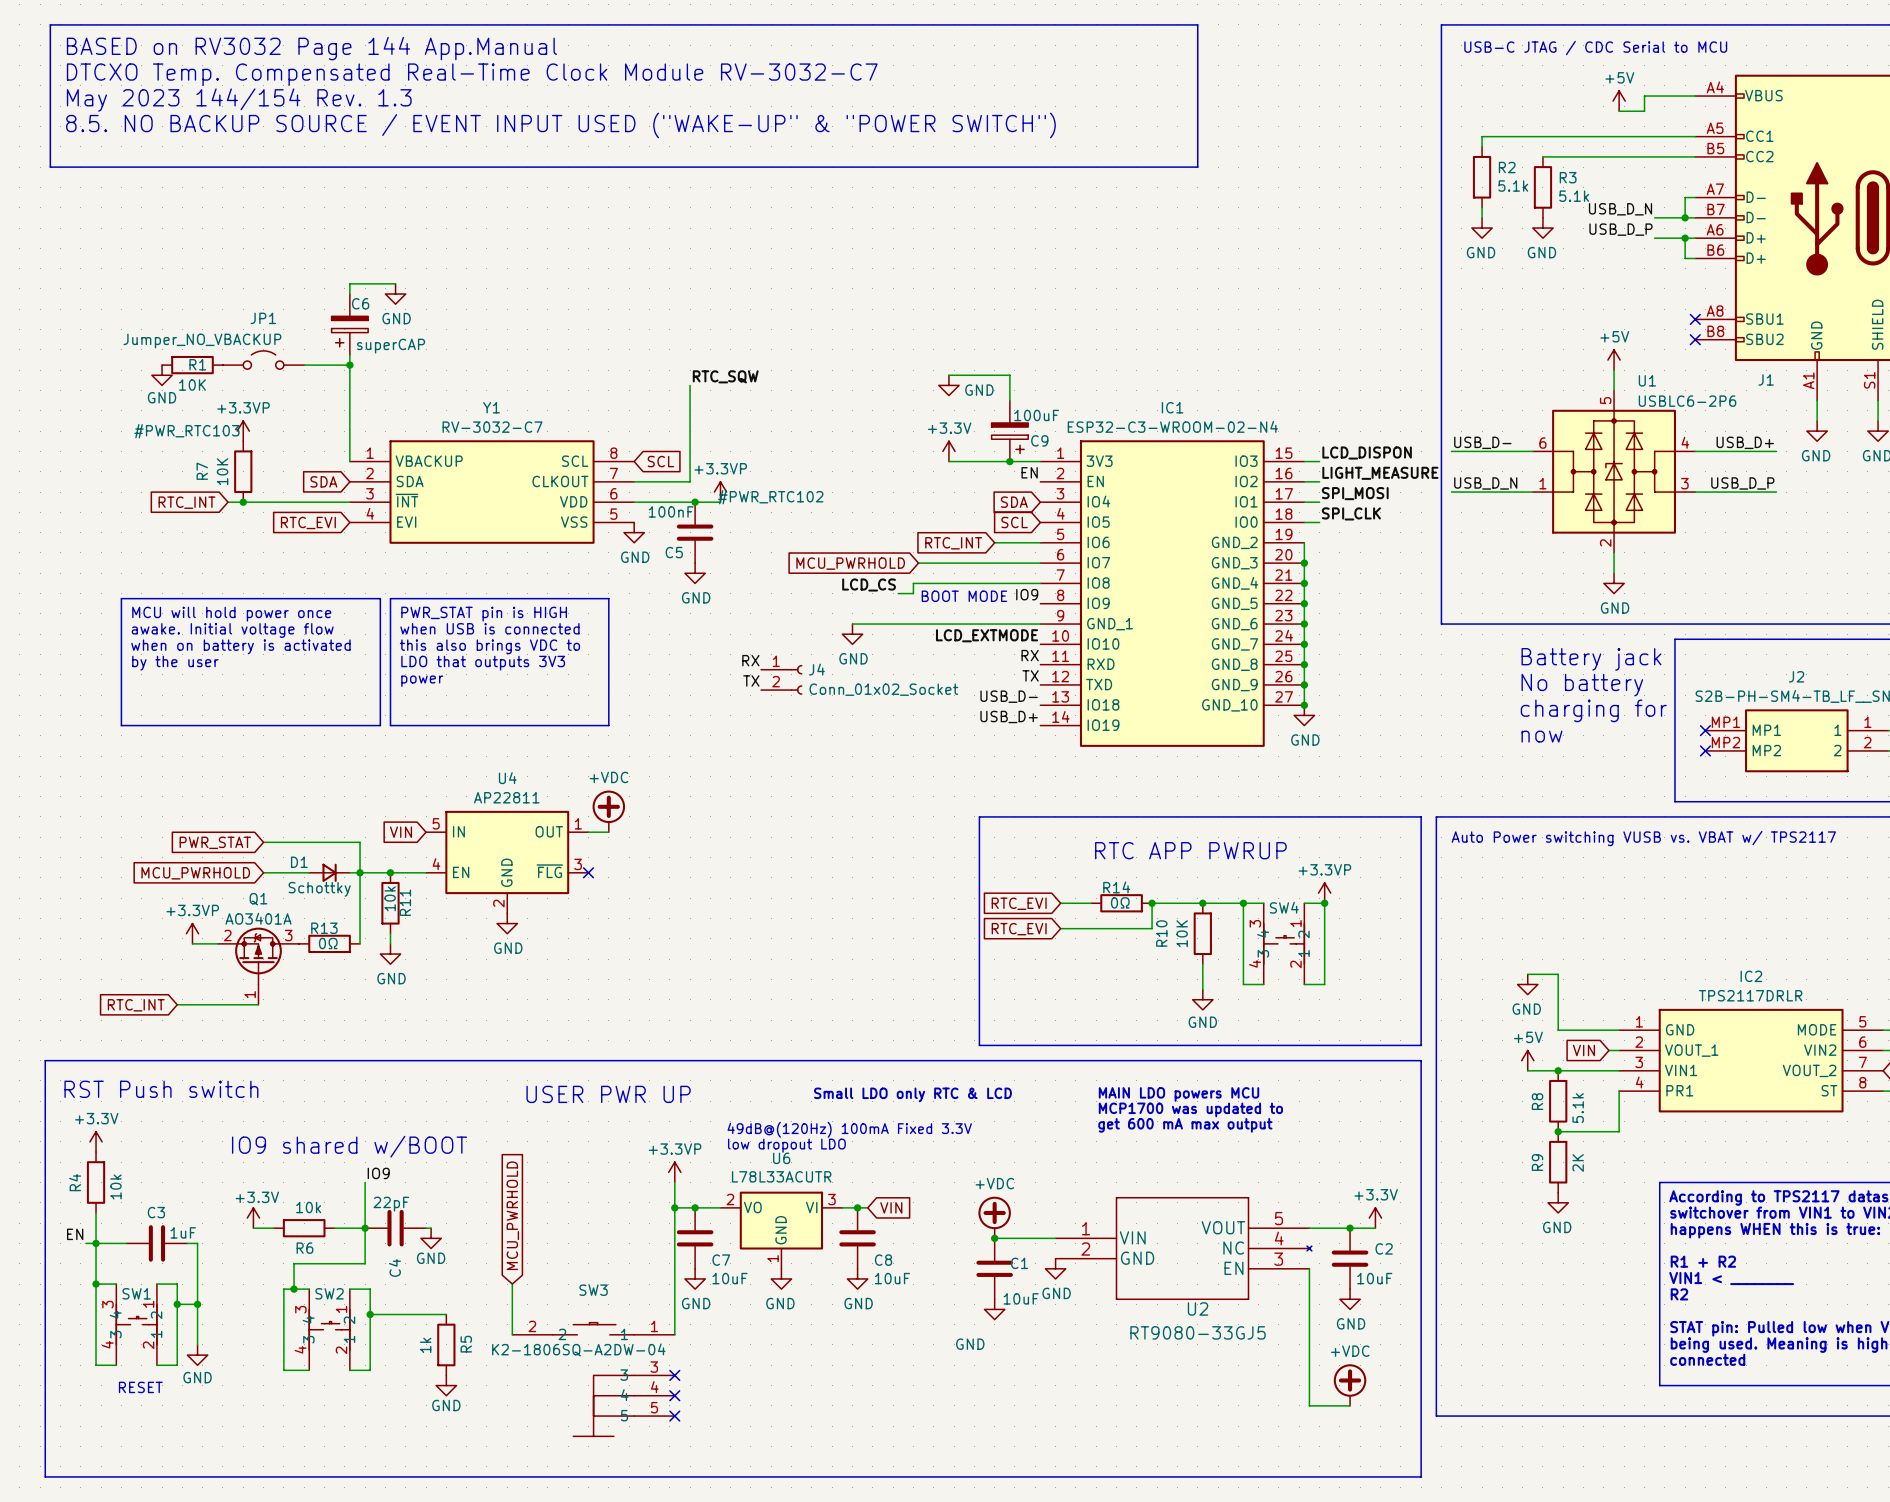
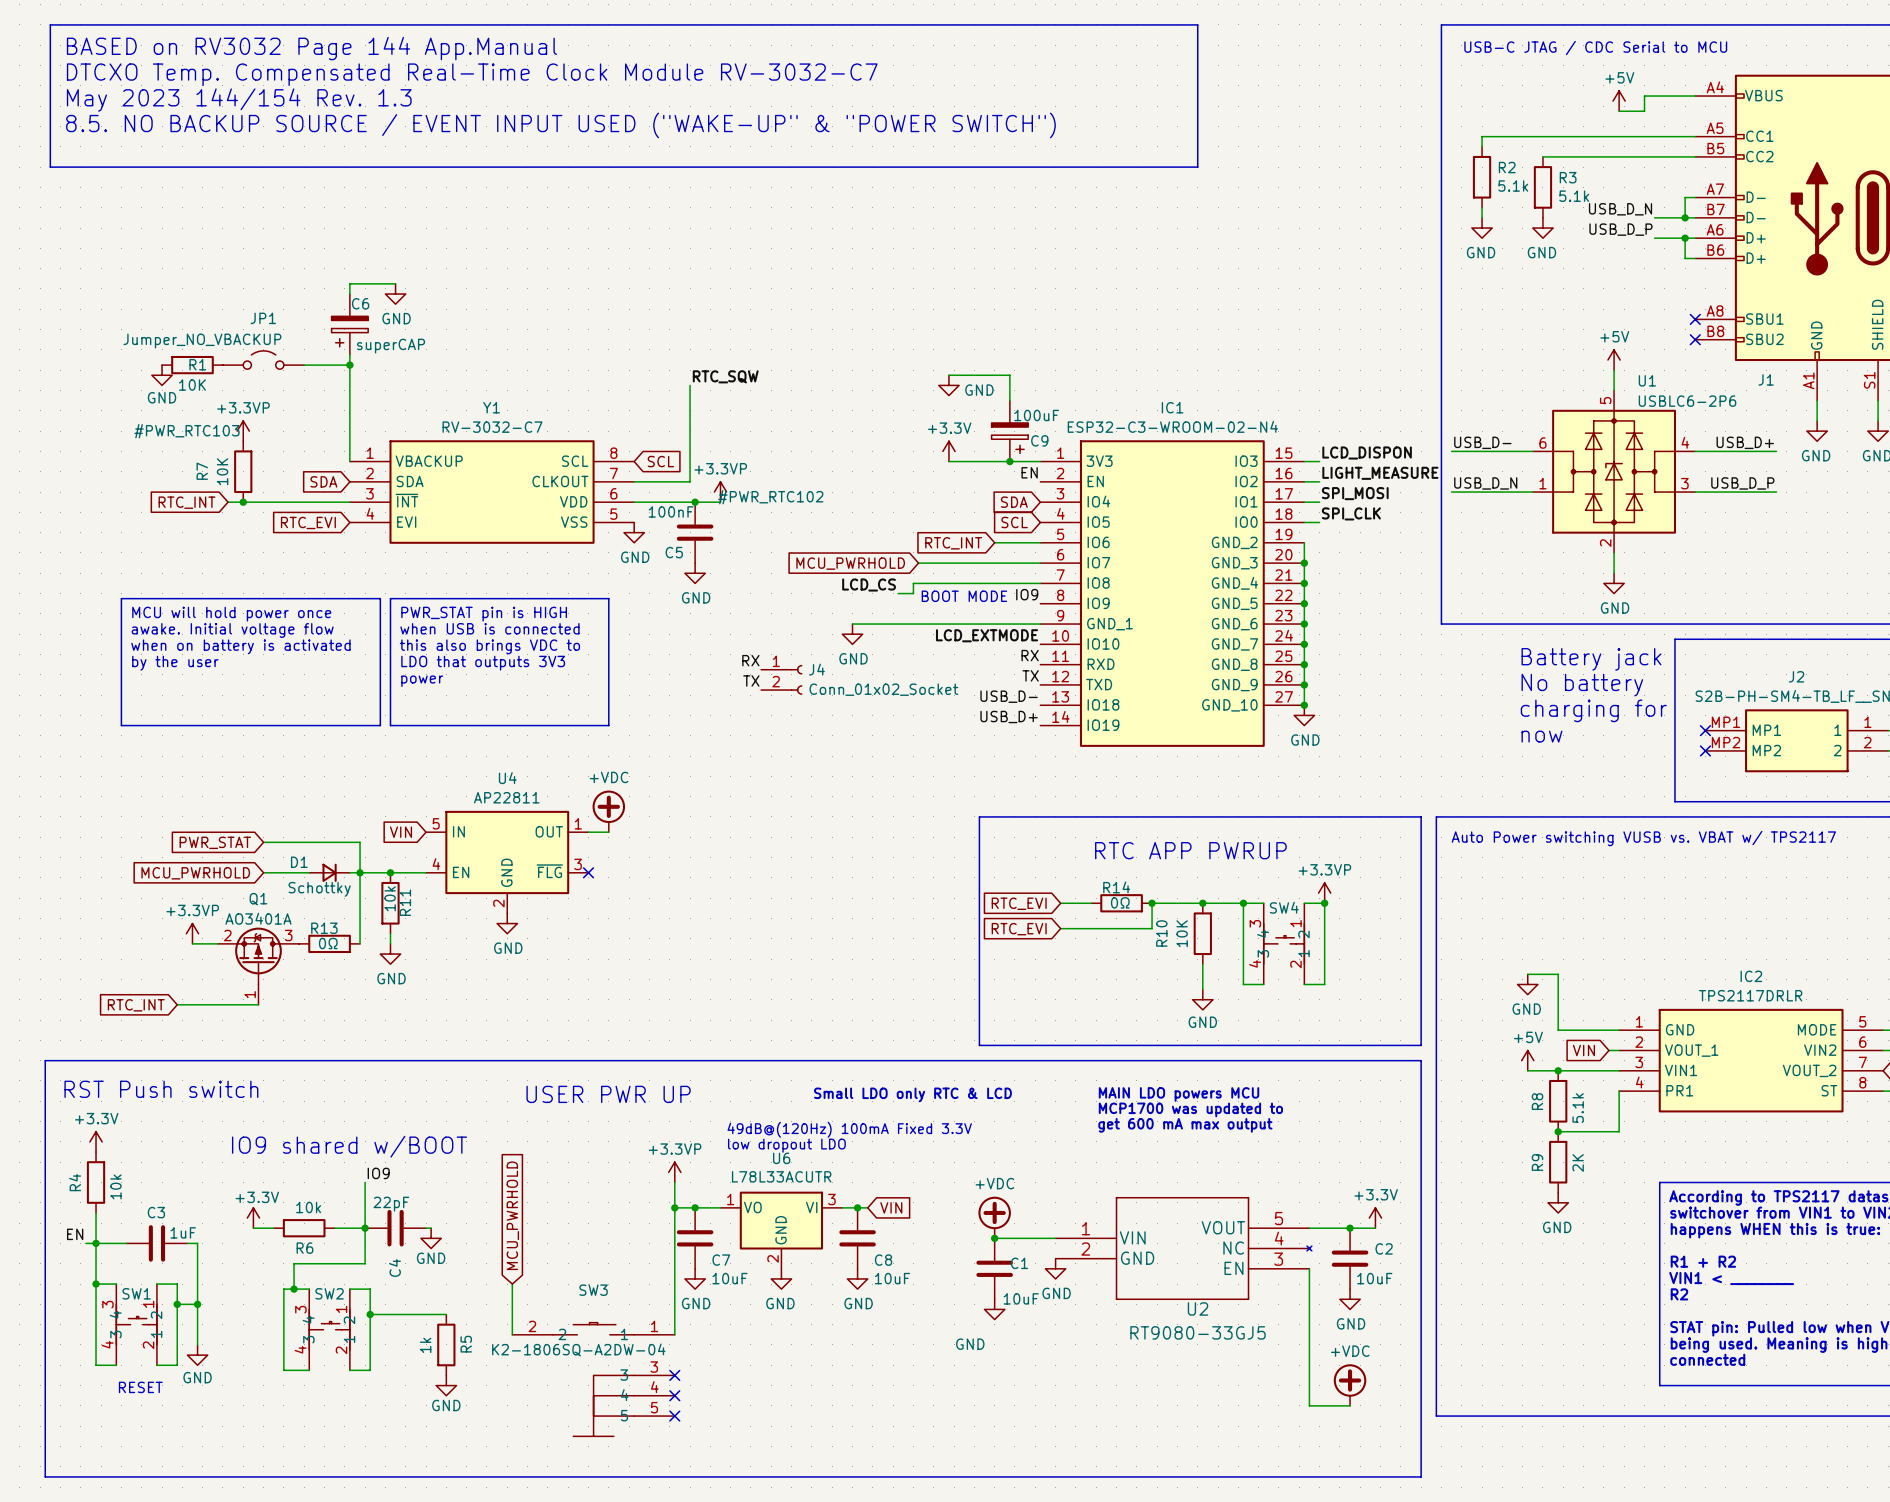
U6 pin number: 2 (730, 1199) -> 1 (730, 1199)
U6 pin number: 1 (773, 1258) -> 2 (773, 1258)

